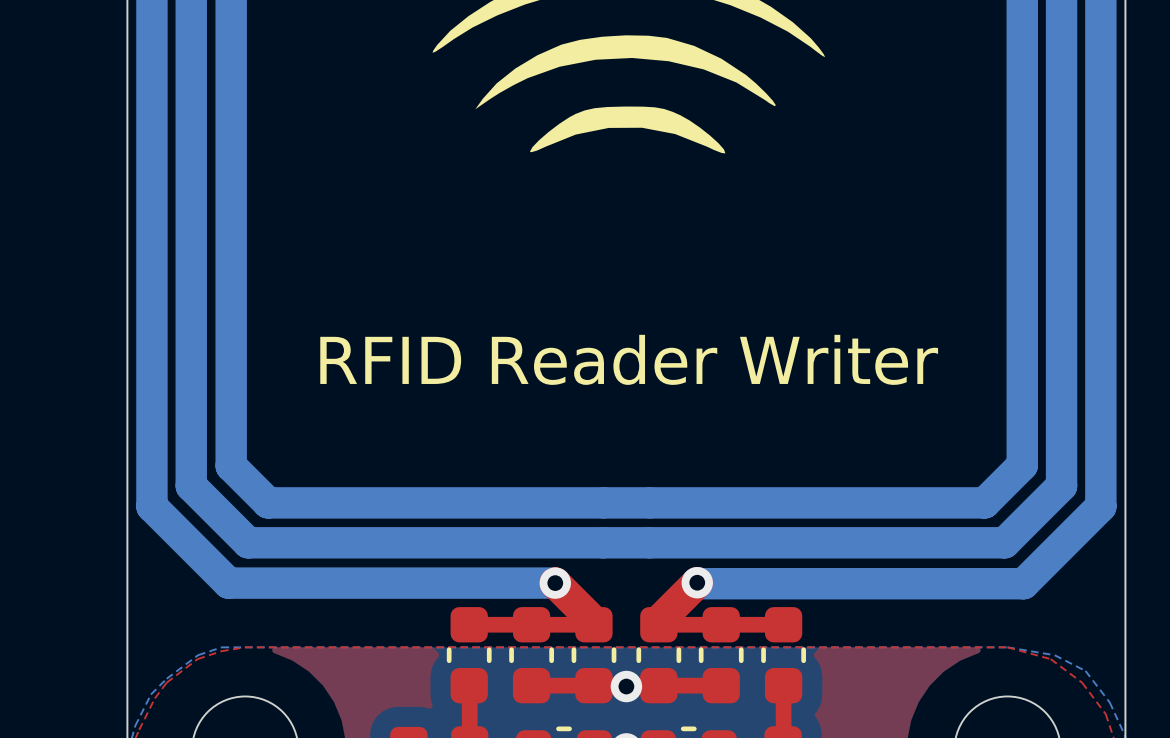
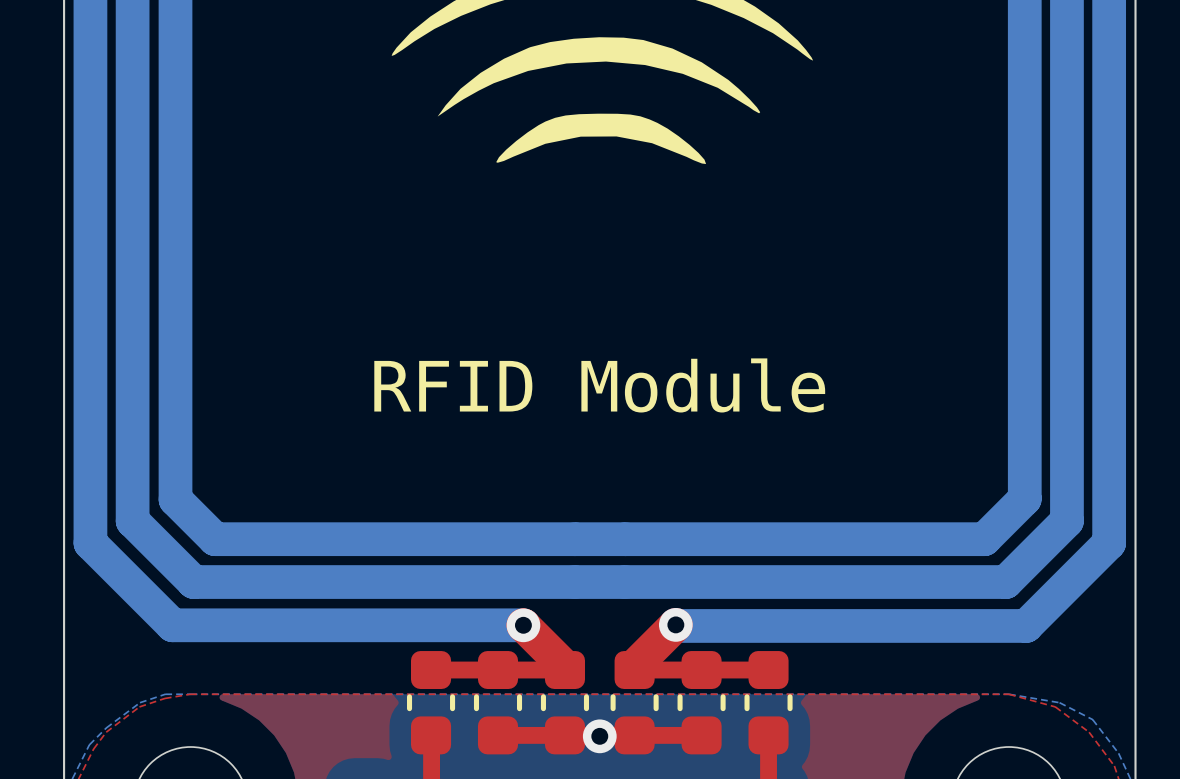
text: RFID Reader Writer (629, 359) -> RFID Module (599, 385)

